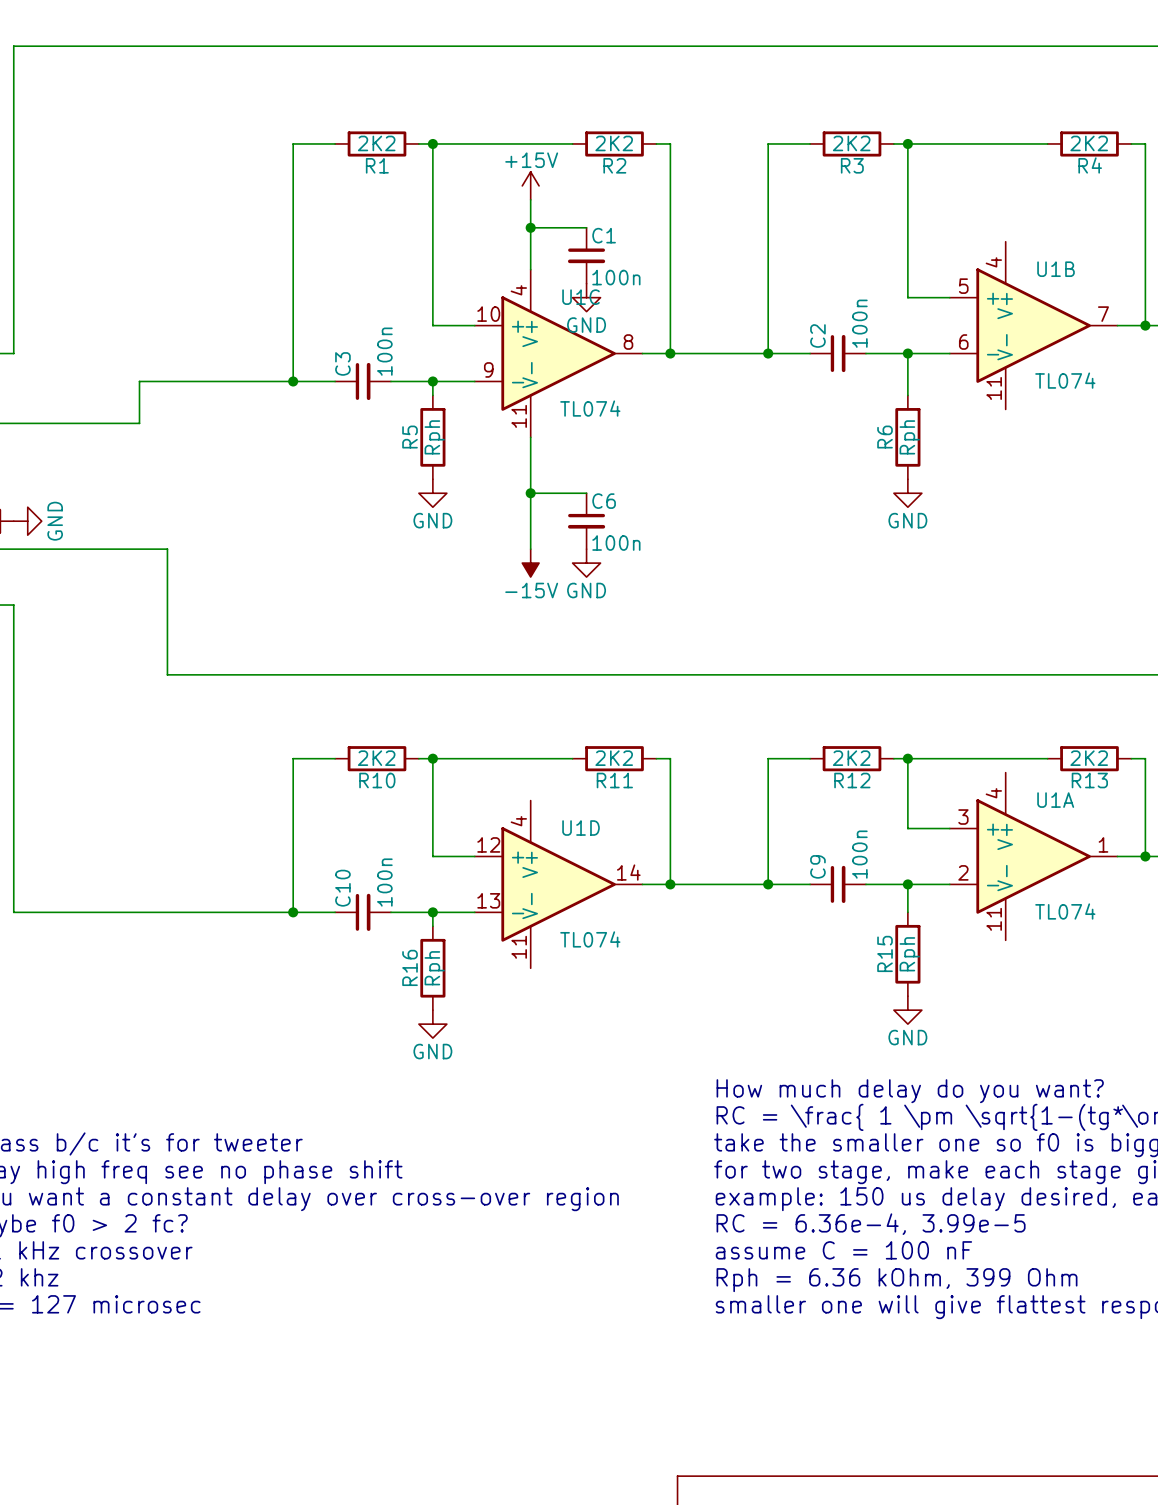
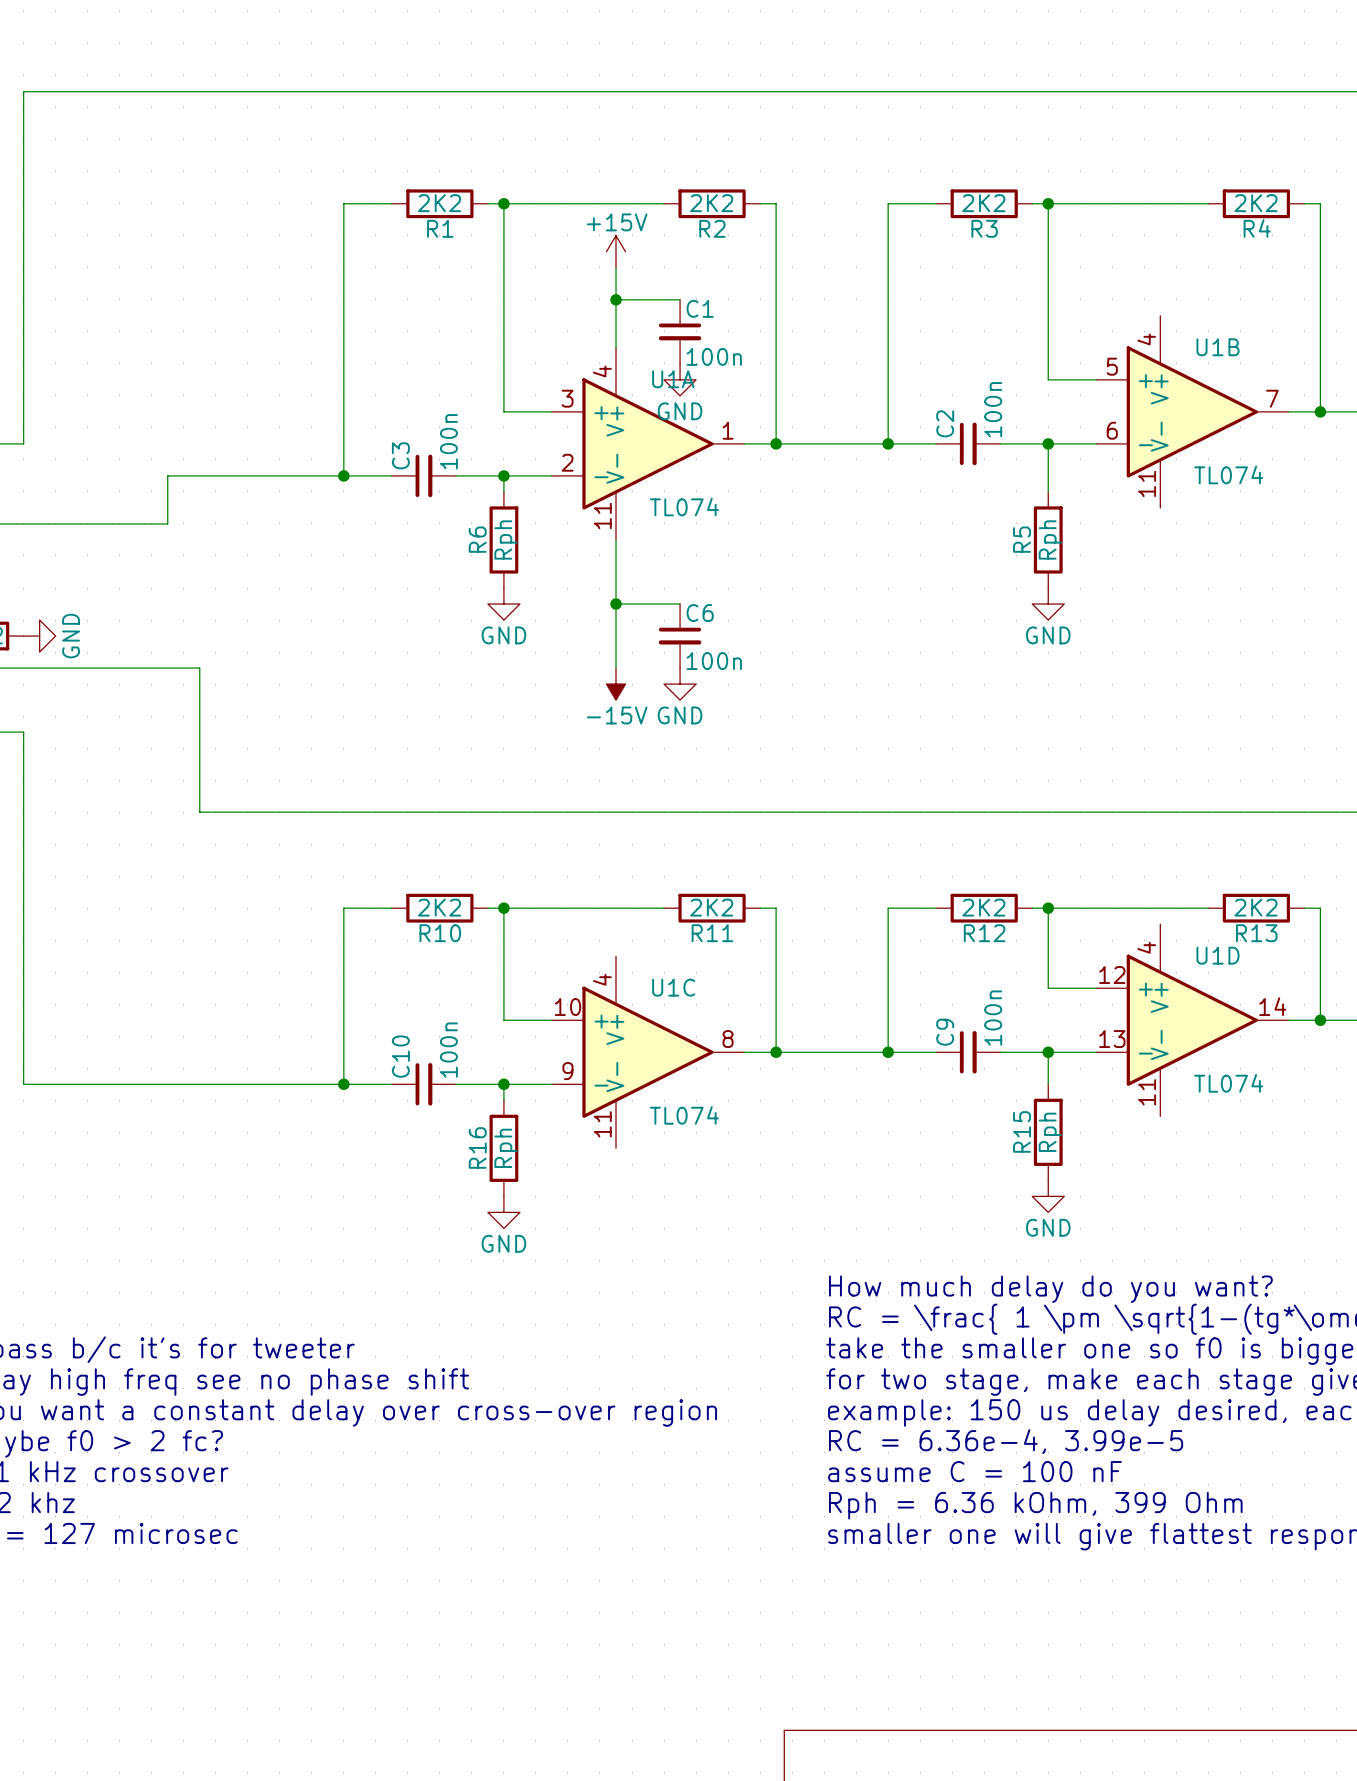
U1C position: (558, 353) -> (648, 1052)
R5 name: R5 (410, 437) -> R6 (477, 539)
R6 name: R6 (885, 437) -> R5 (1022, 539)
U1A position: (1033, 856) -> (648, 443)
U1D position: (558, 884) -> (1192, 1020)

